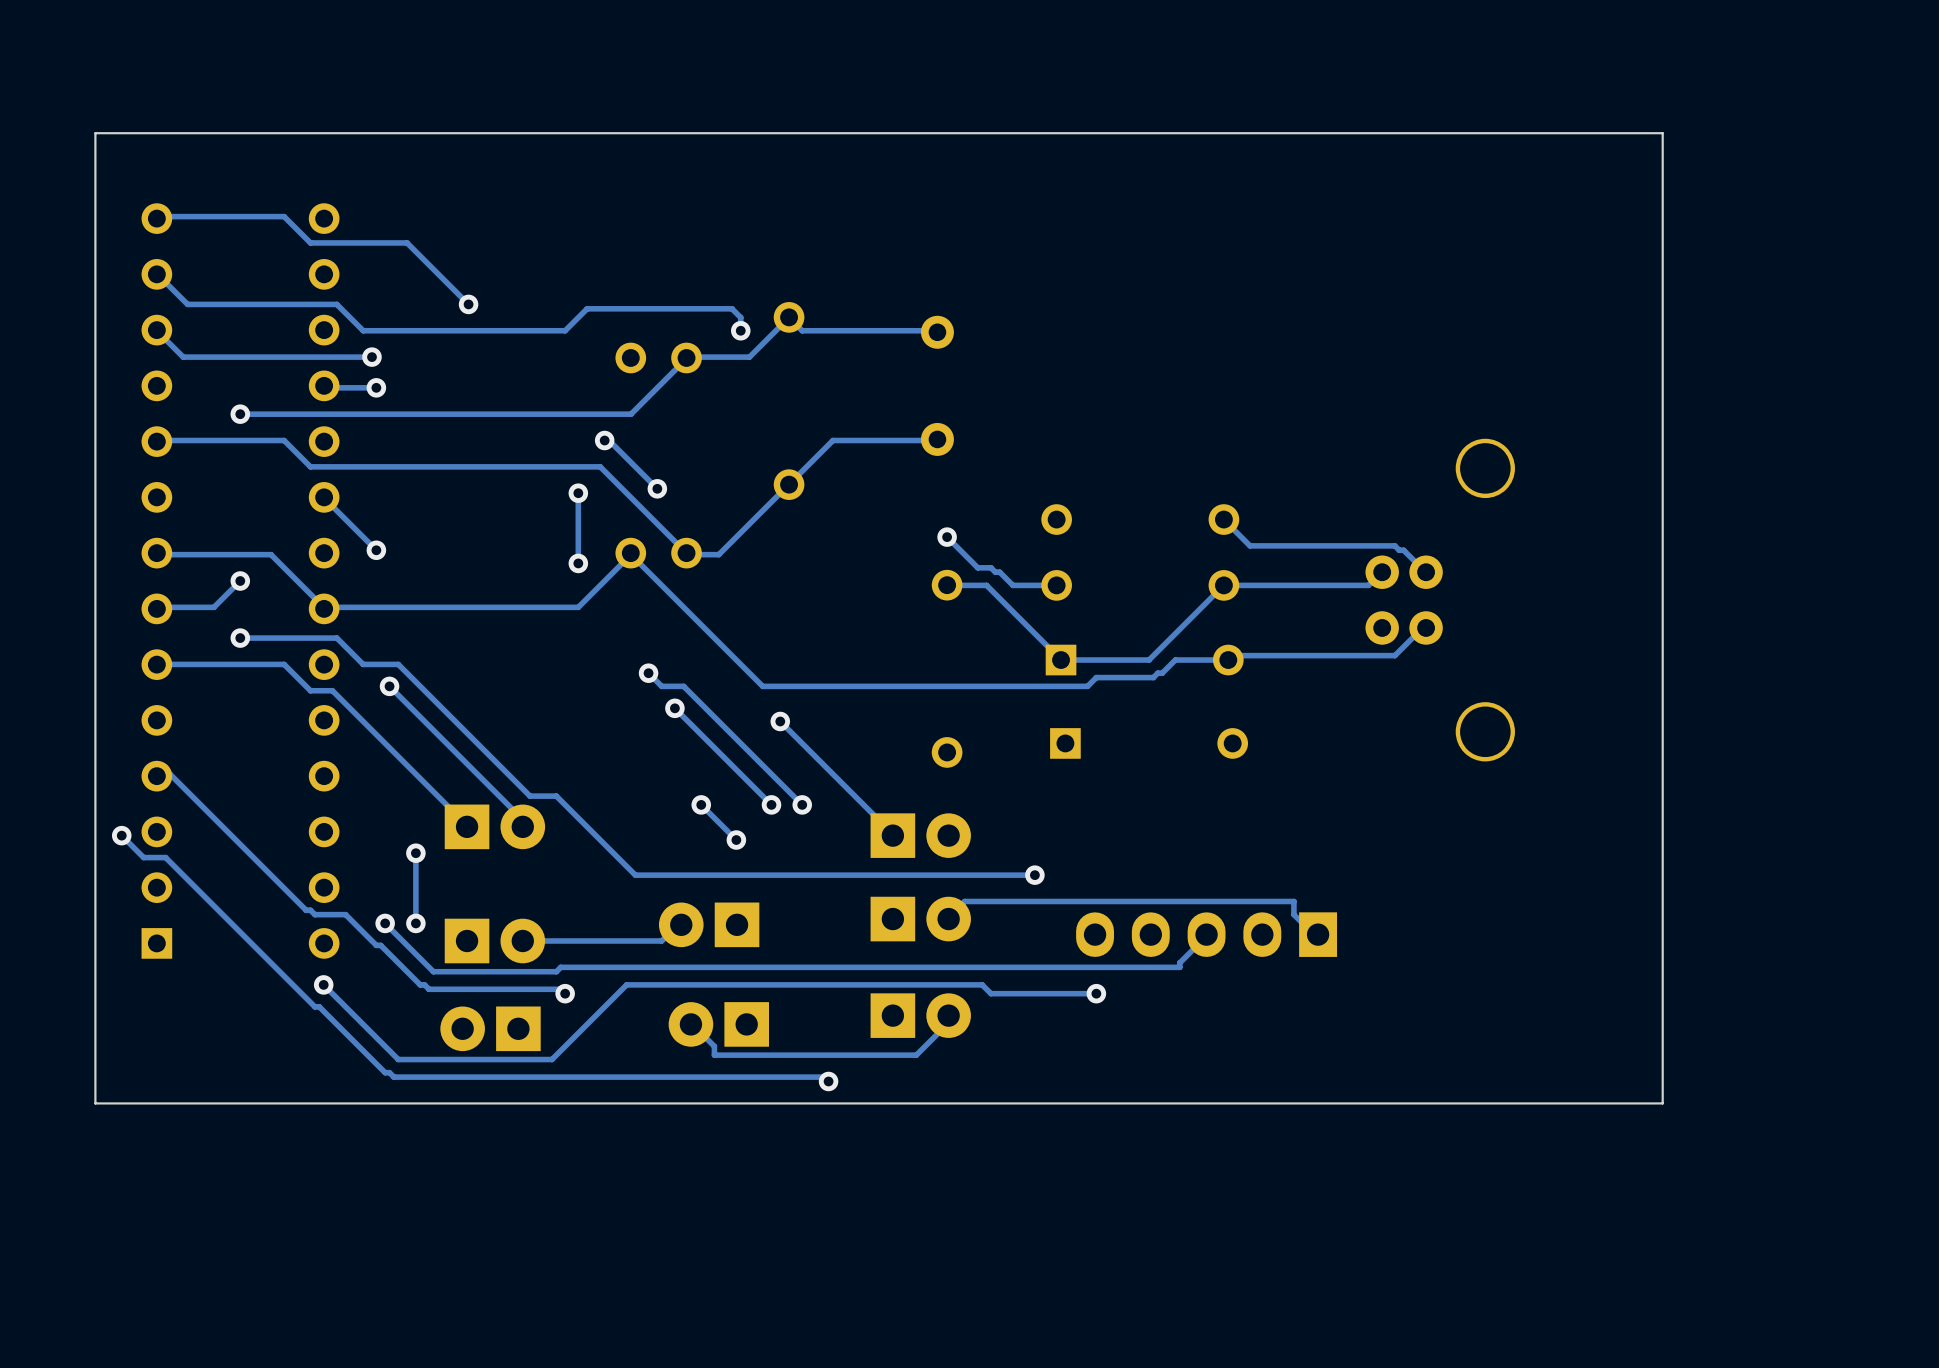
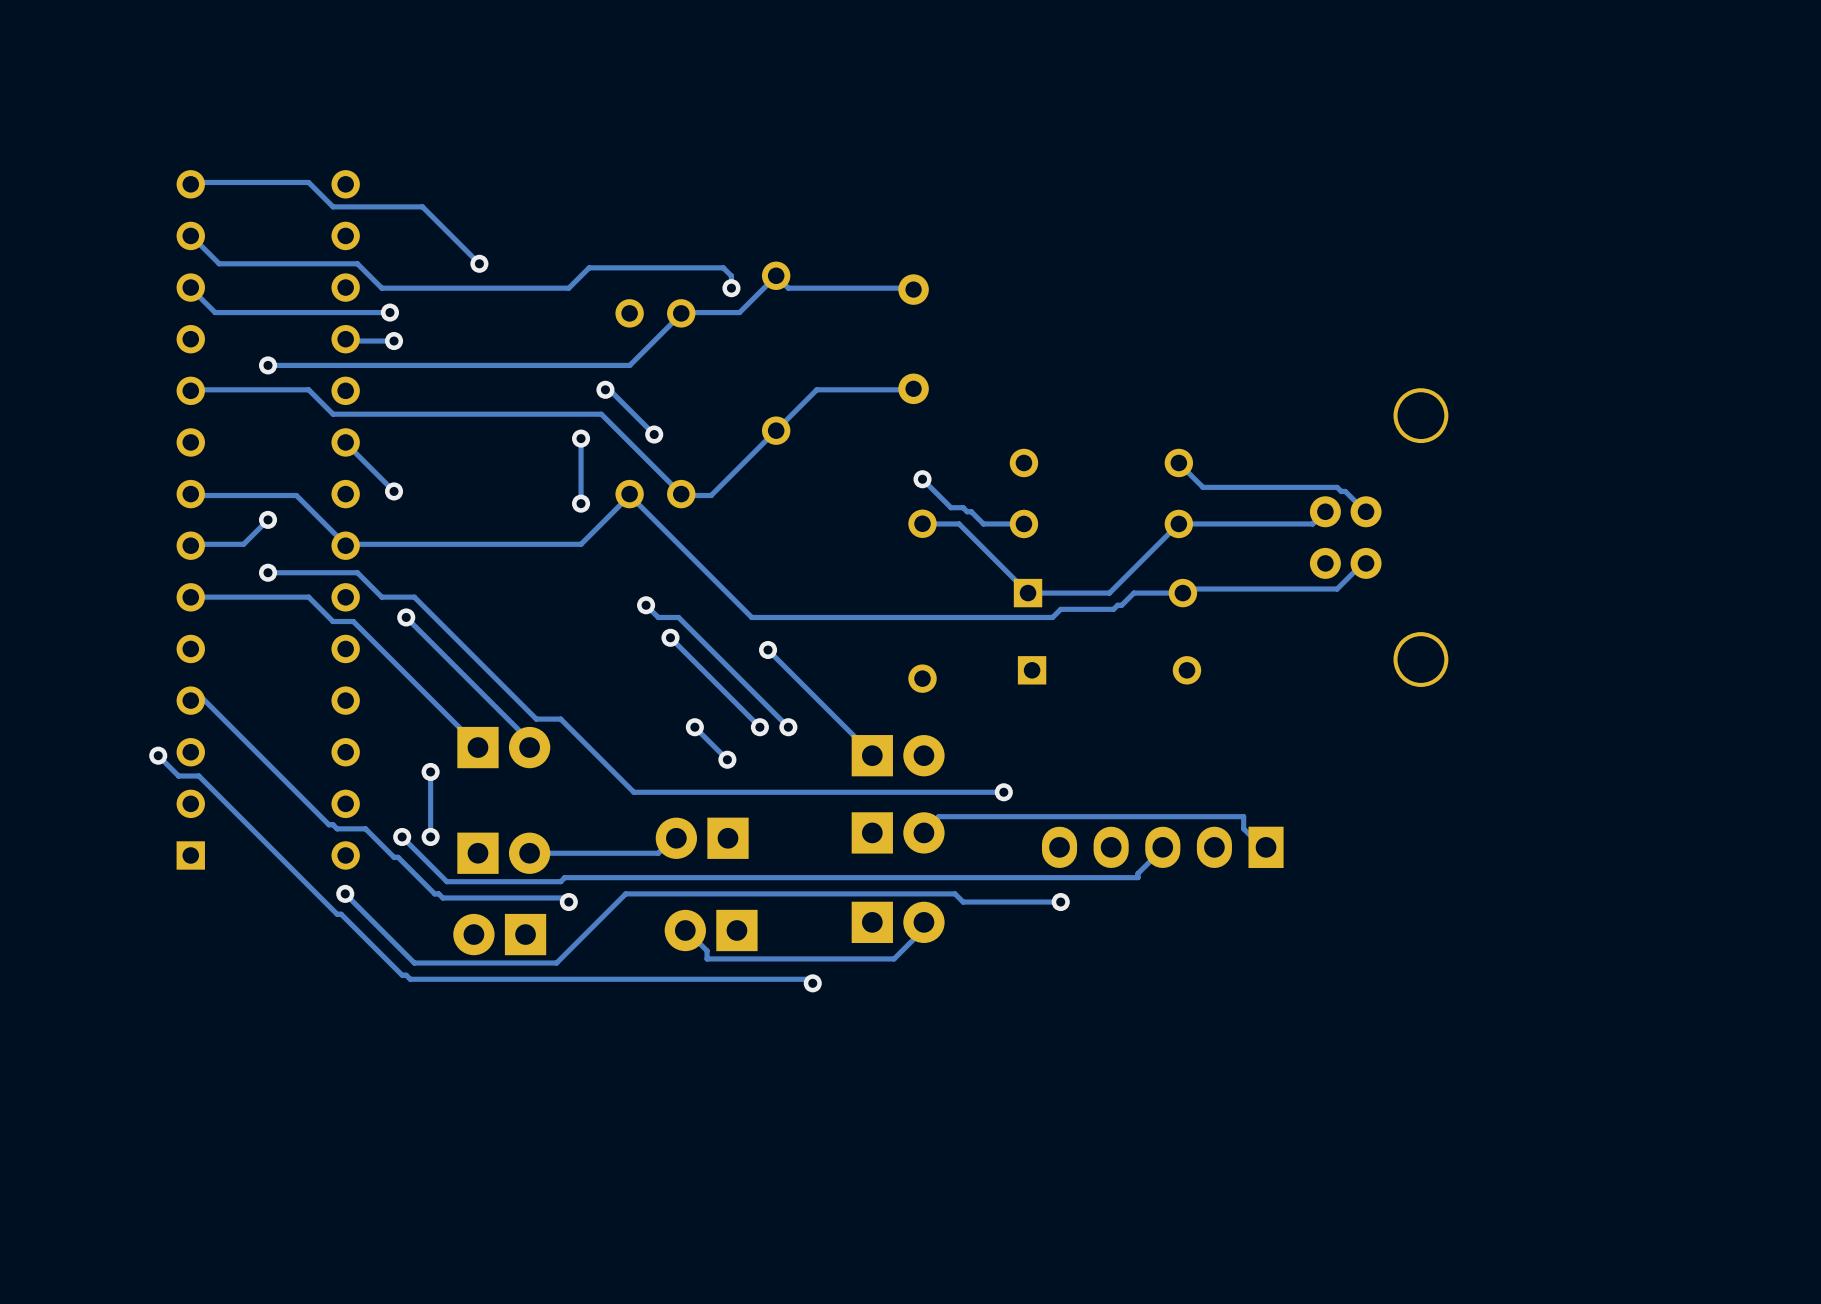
board edge: (1662, 133) (95, 133) (95, 1103) (1662, 1103) (1662, 133) -> none

